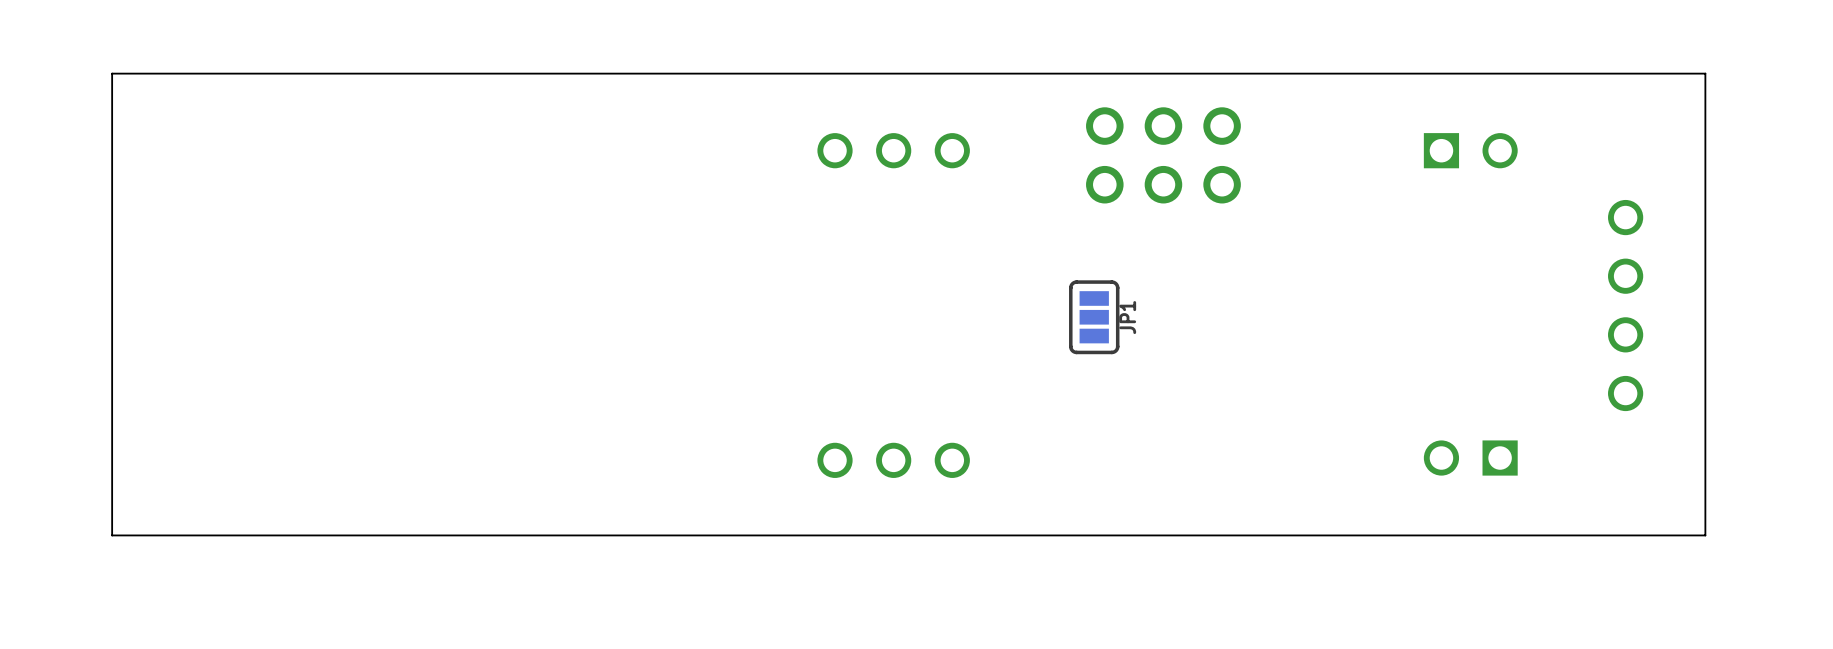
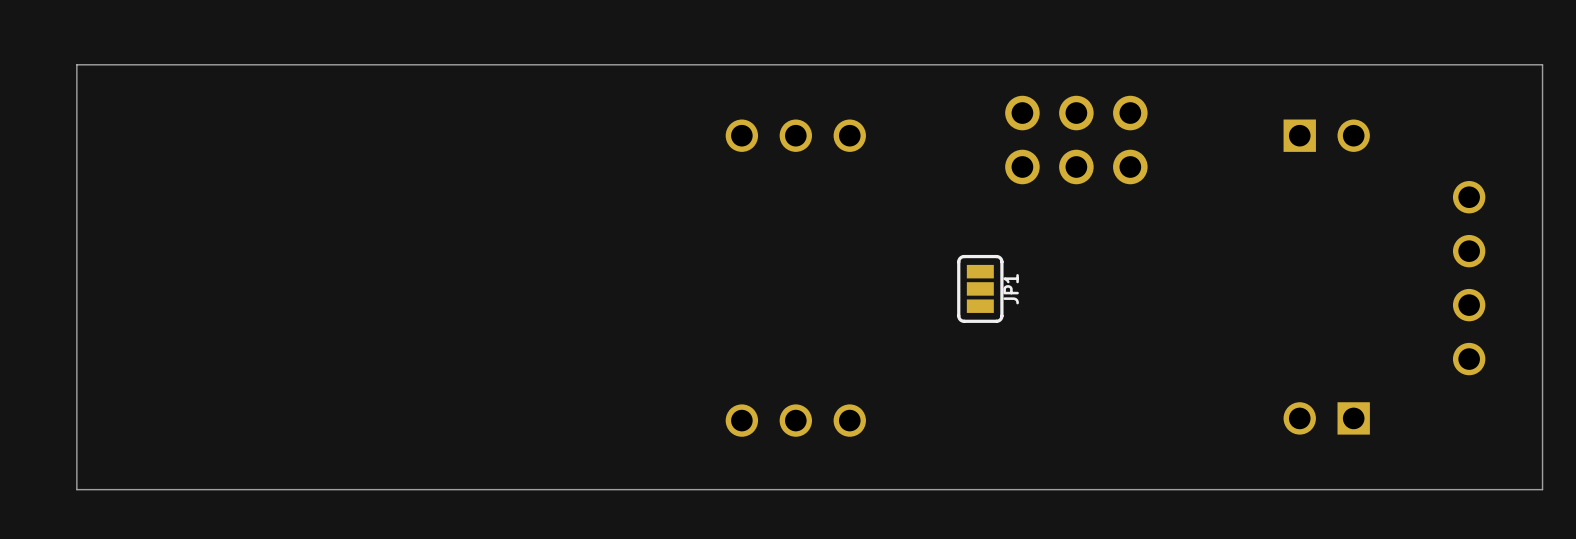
part position: (1163, 155) -> (1076, 140)

